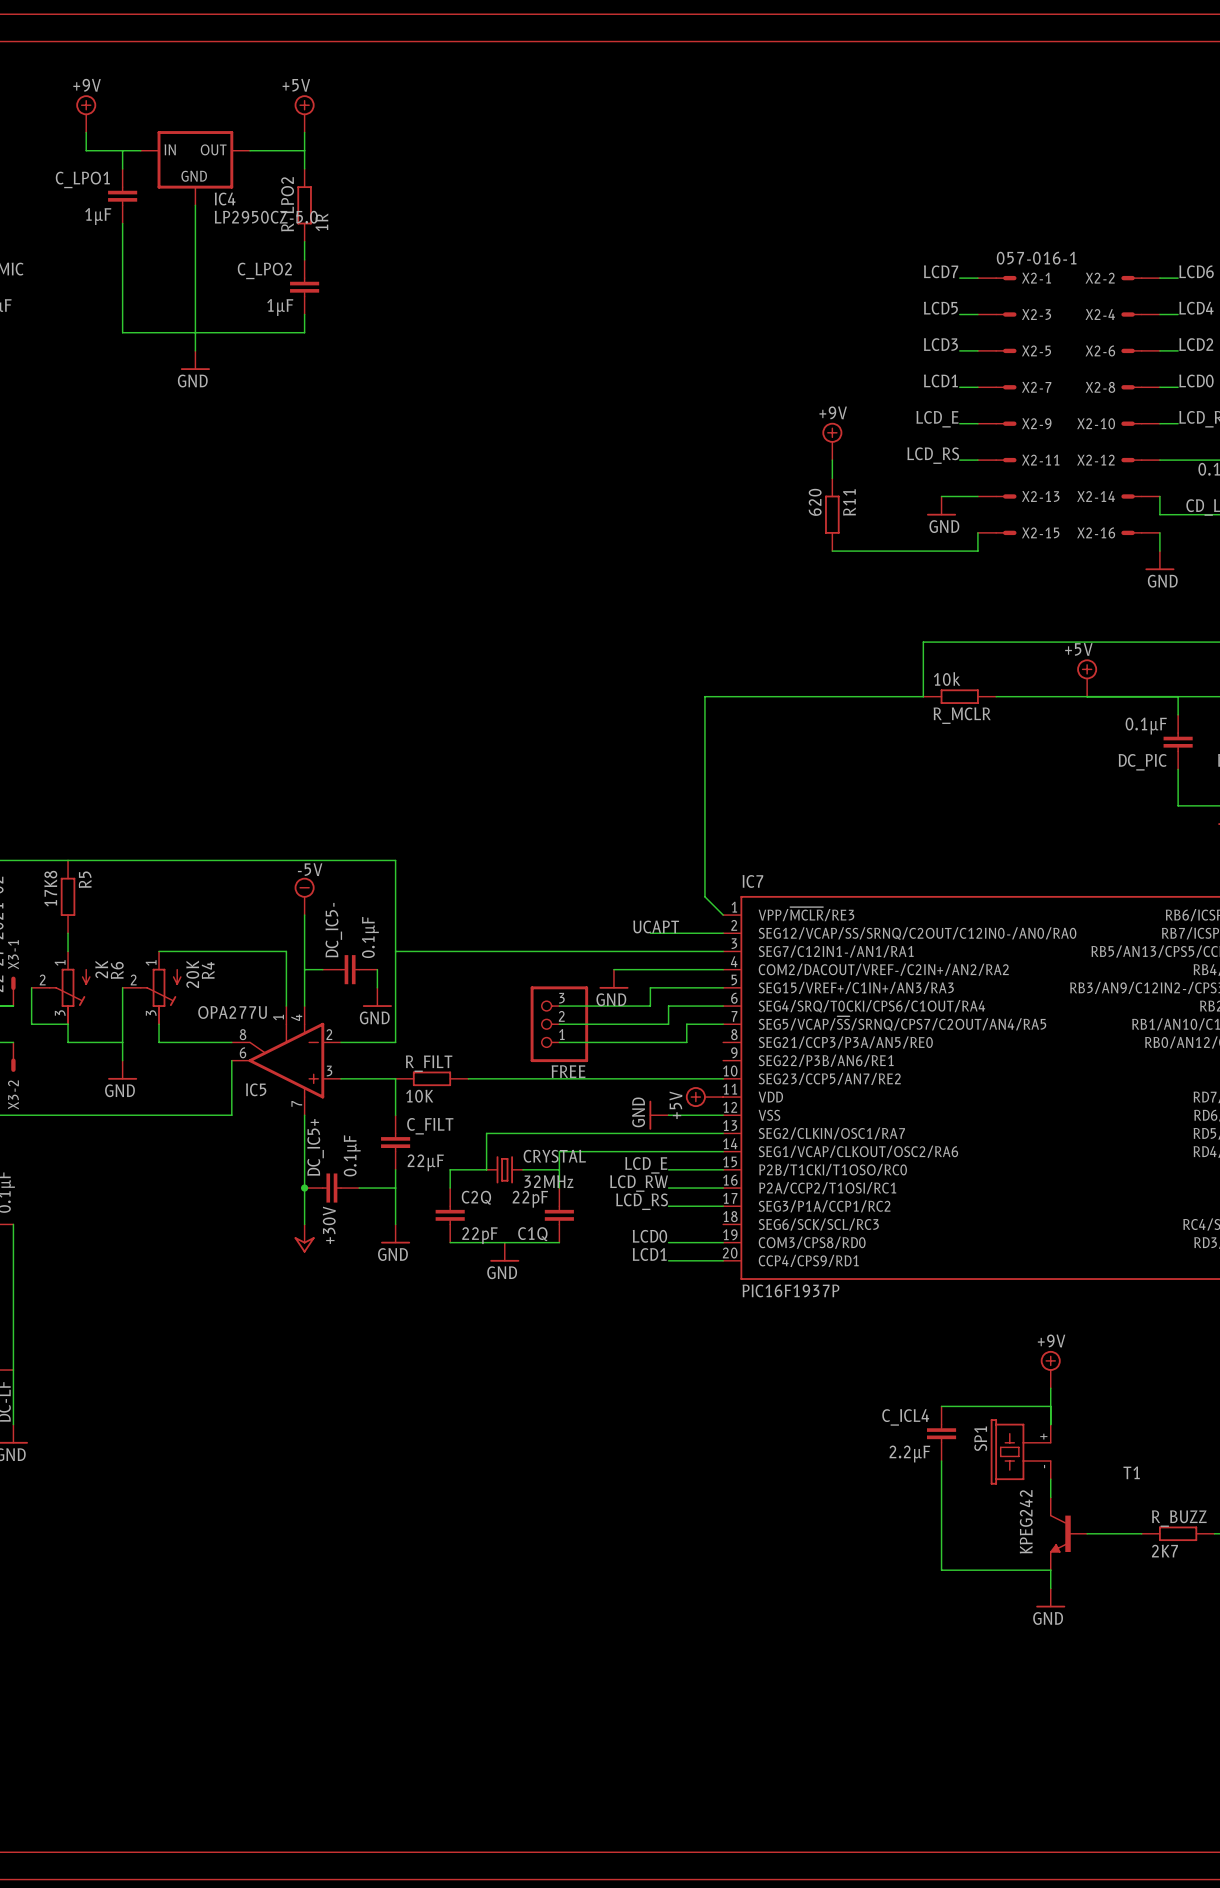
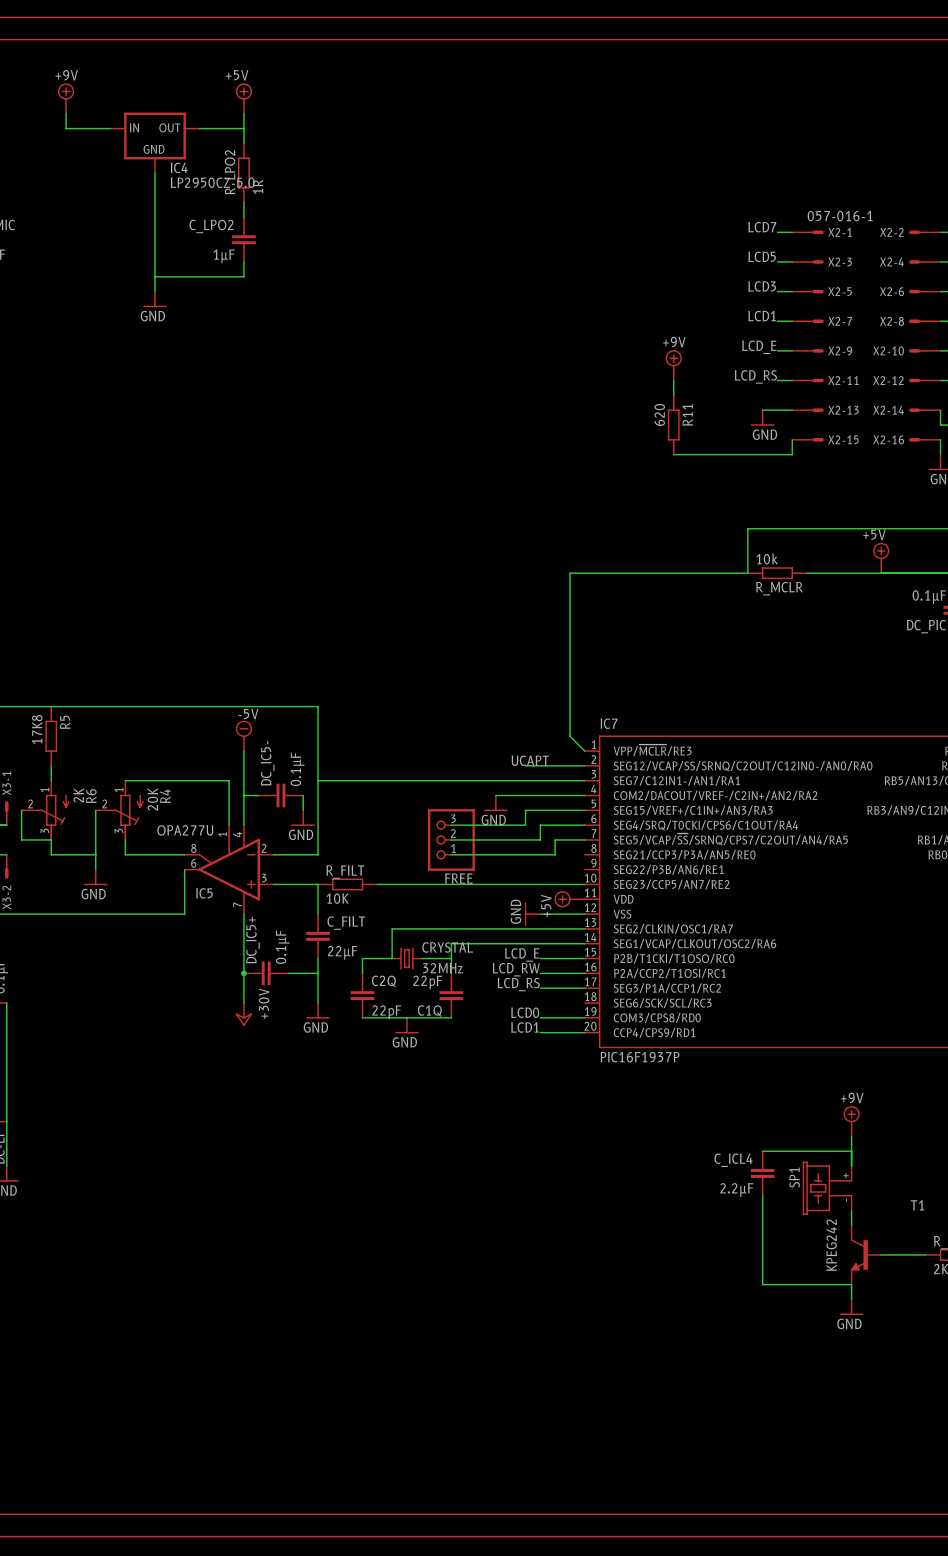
wire: (122, 150) (122, 168) -> none
C_LPO1: 1µF (122, 196) -> none
wire: (122, 223) (122, 332) (195, 332) -> none

